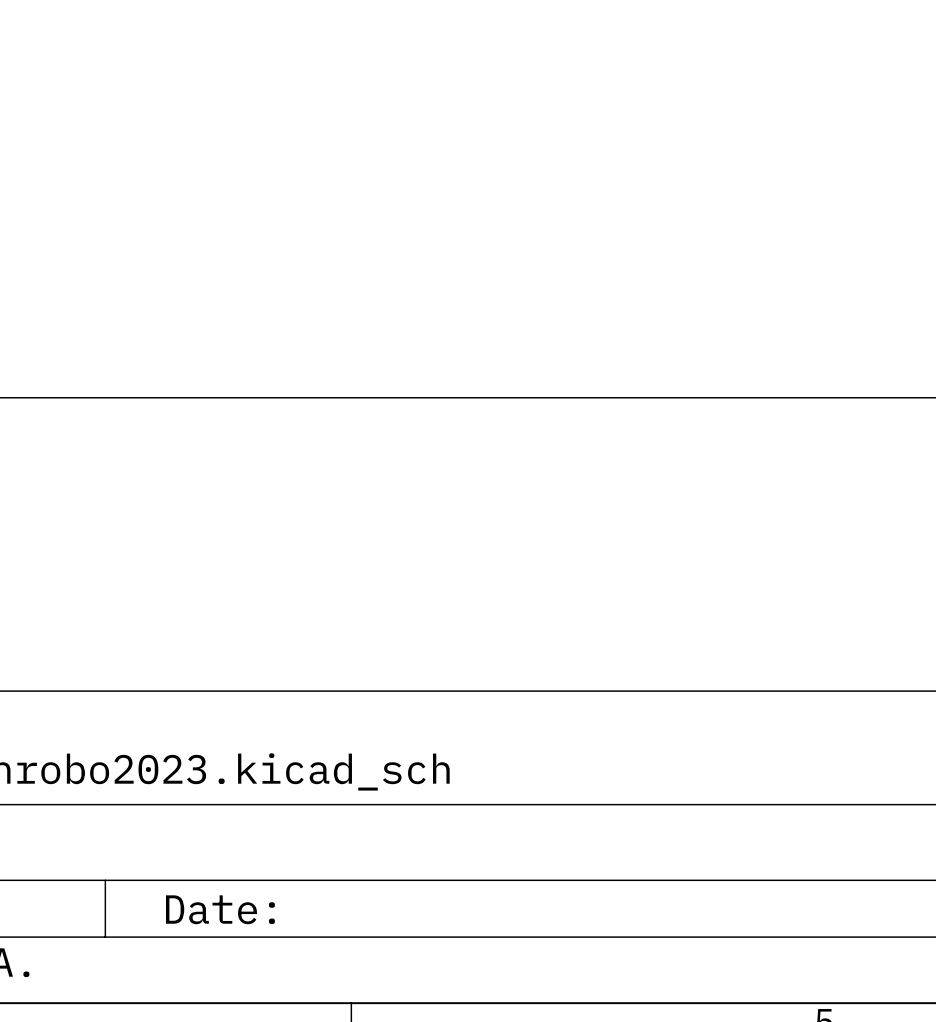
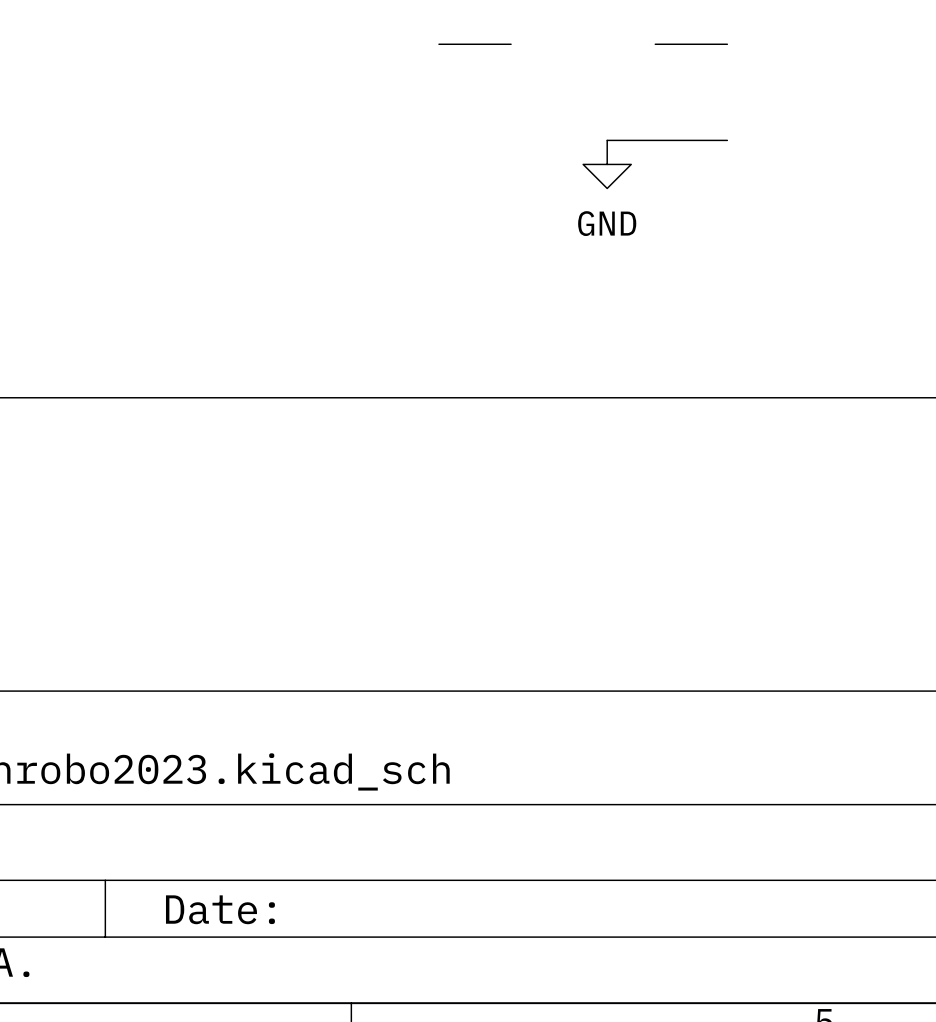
wire: none -> (438, 44) (511, 44)
wire: none -> (655, 44) (727, 44)
wire: none -> (607, 140) (727, 140)
power symbol: none -> GND (607, 164)

